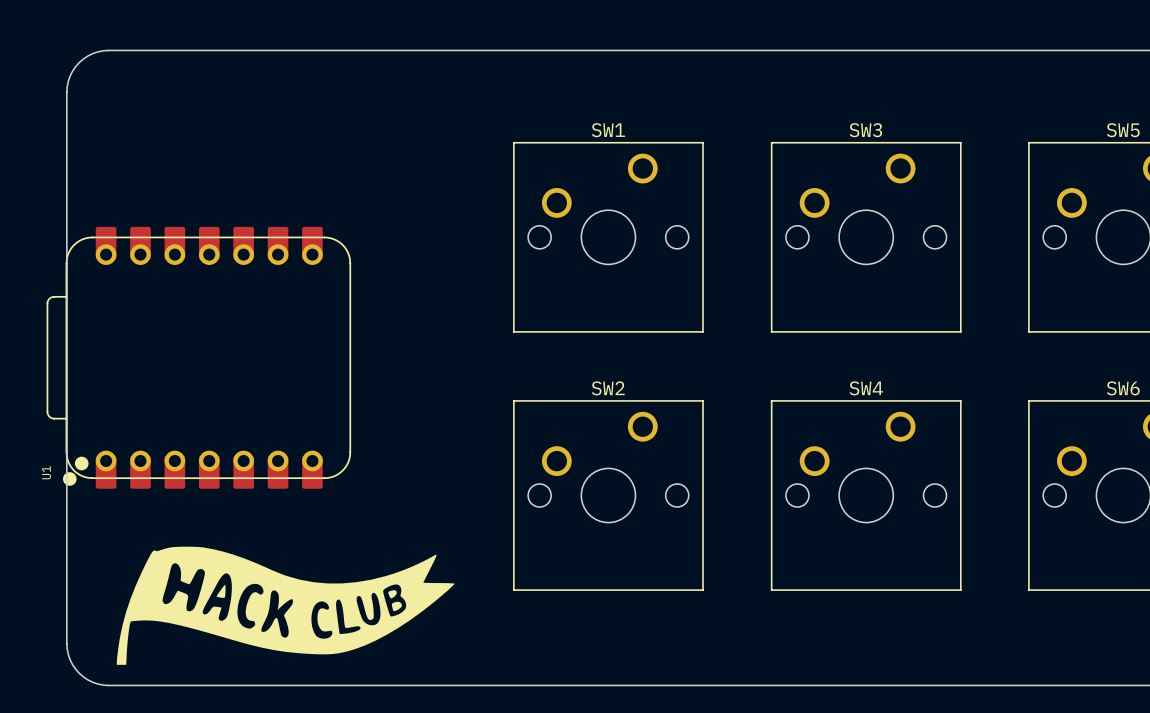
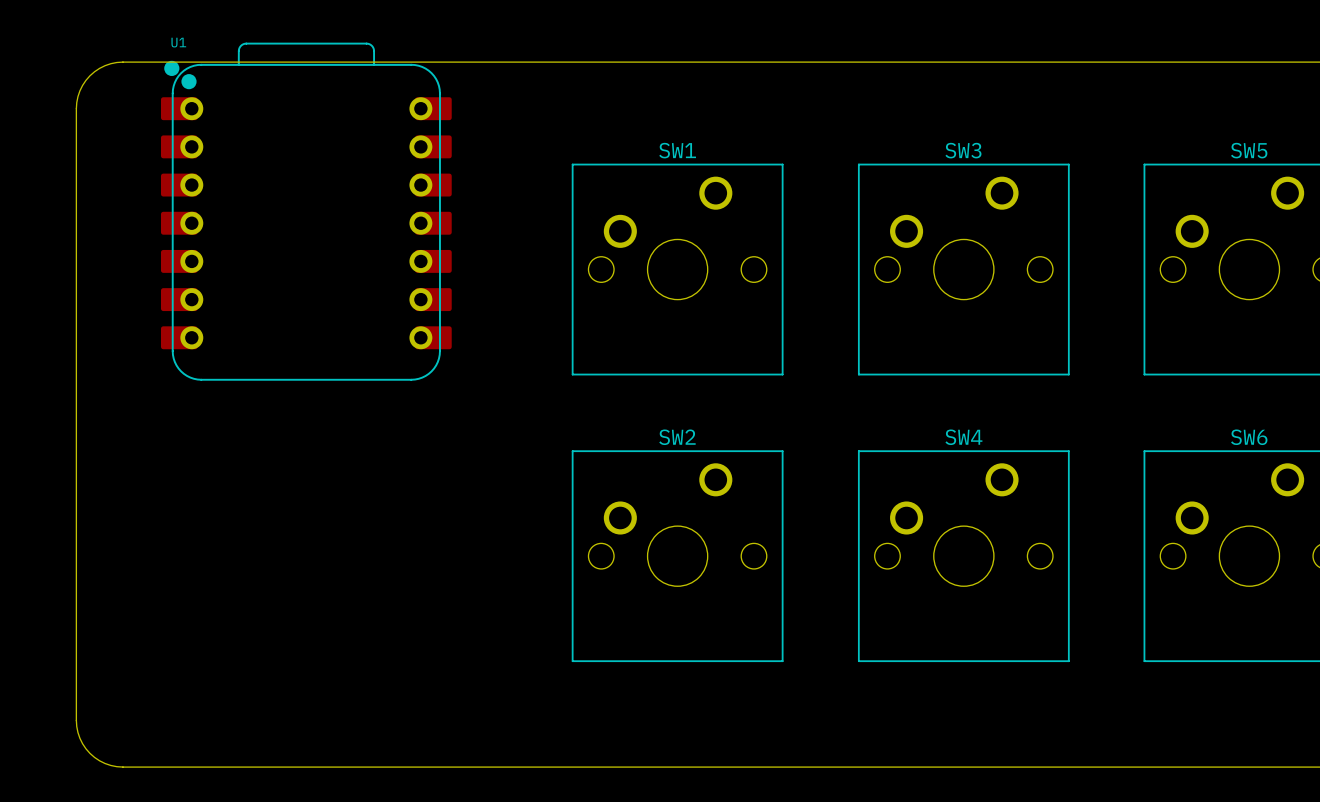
U1 rotation: 0° (198, 357) -> 90° clockwise (306, 211)
U1 position: (198, 357) -> (306, 211)
drawing: [116, 546, 455, 665] -> none

